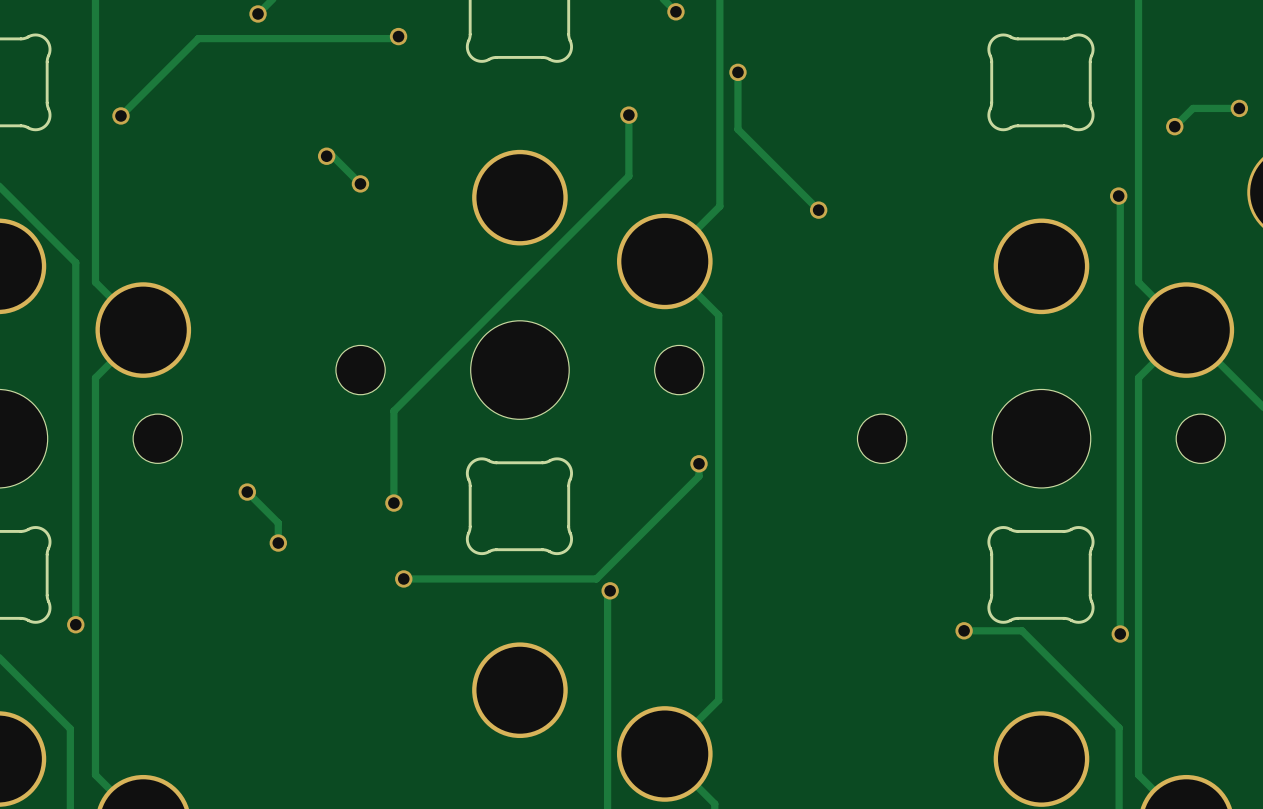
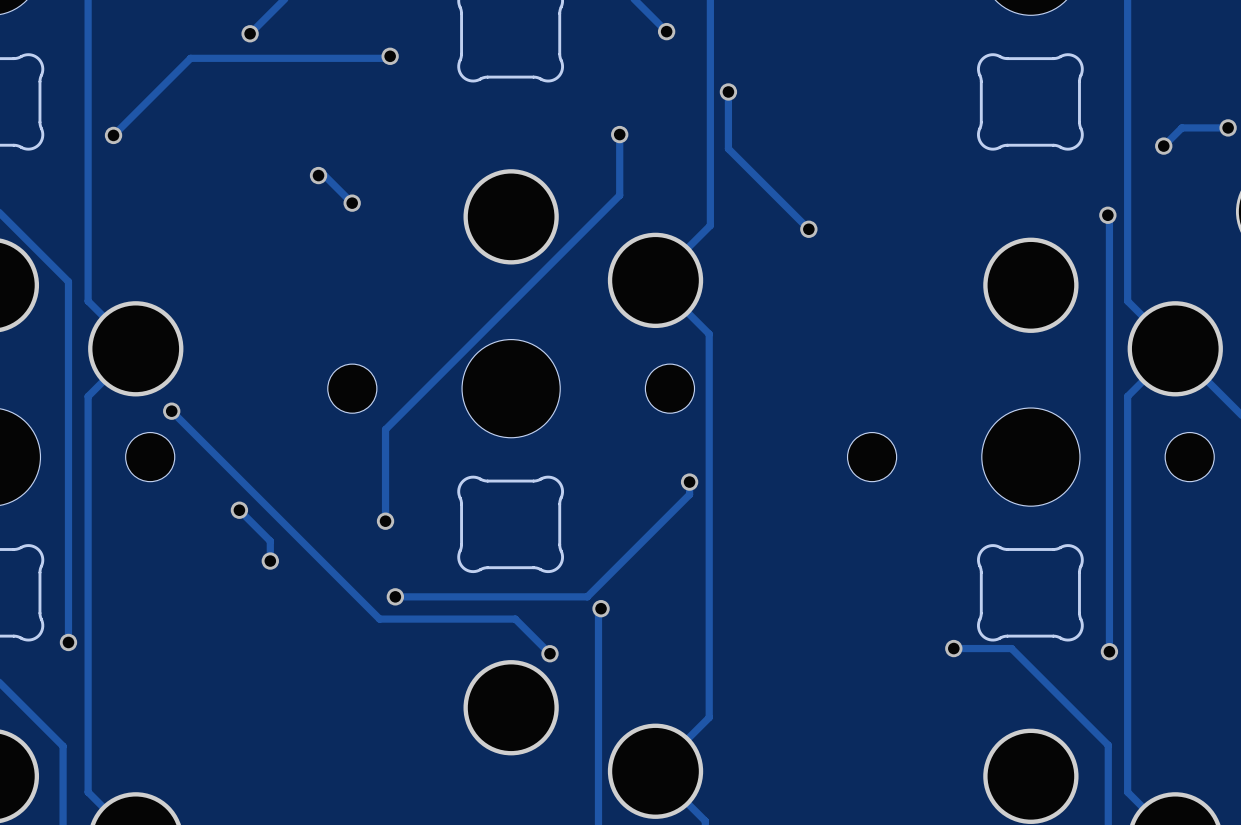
track: none -> (171, 411) (379, 619) (515, 619) (549, 653)
via: none -> (171, 411)
via: none -> (549, 653)

